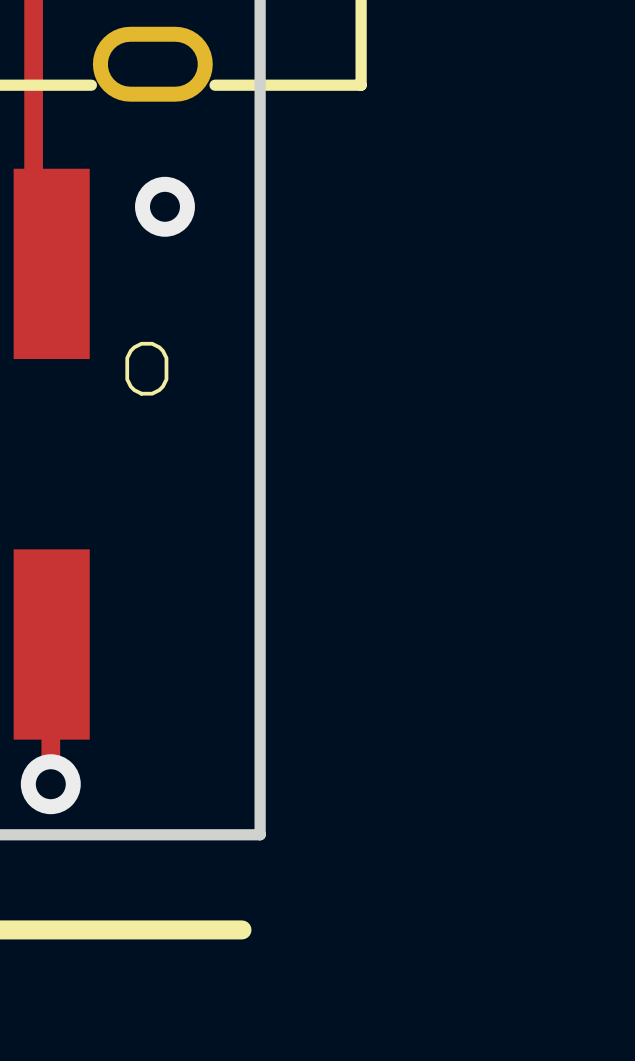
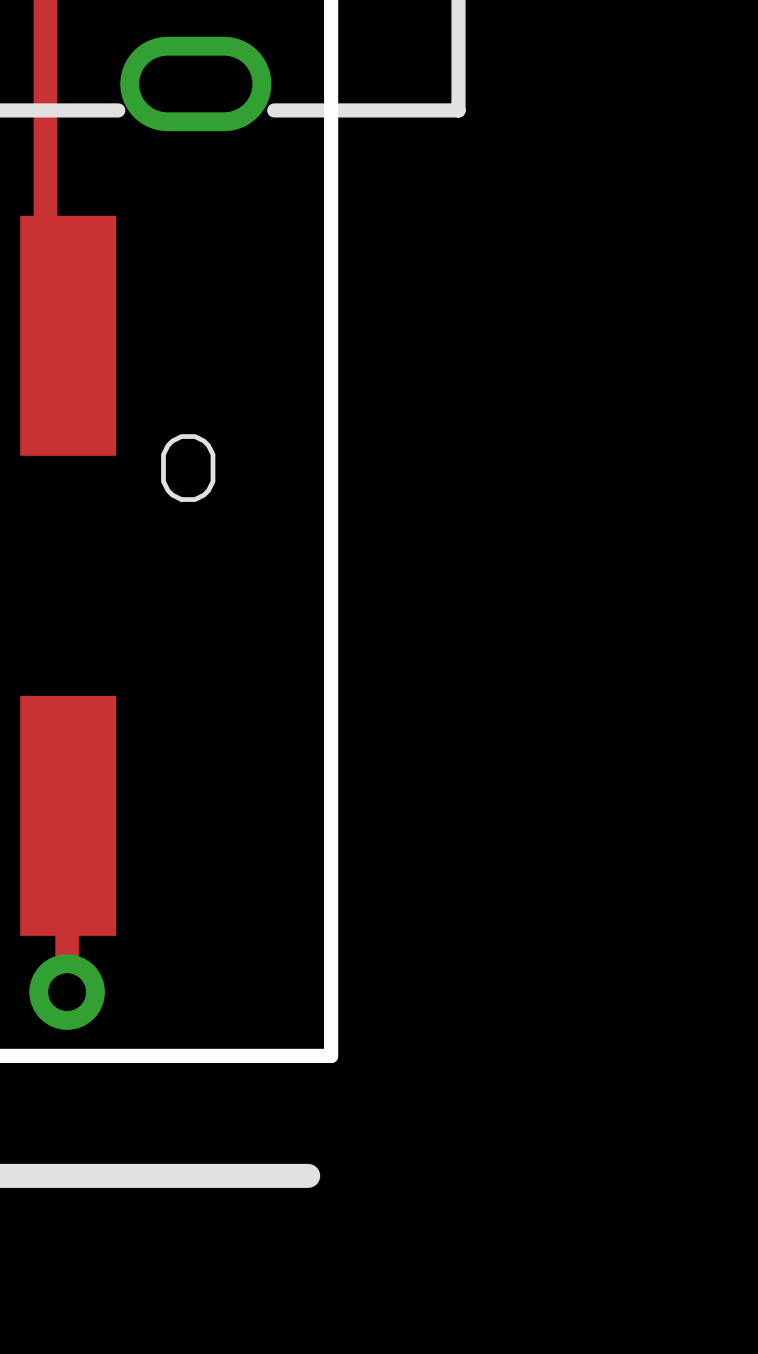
via: (164, 206) -> none

